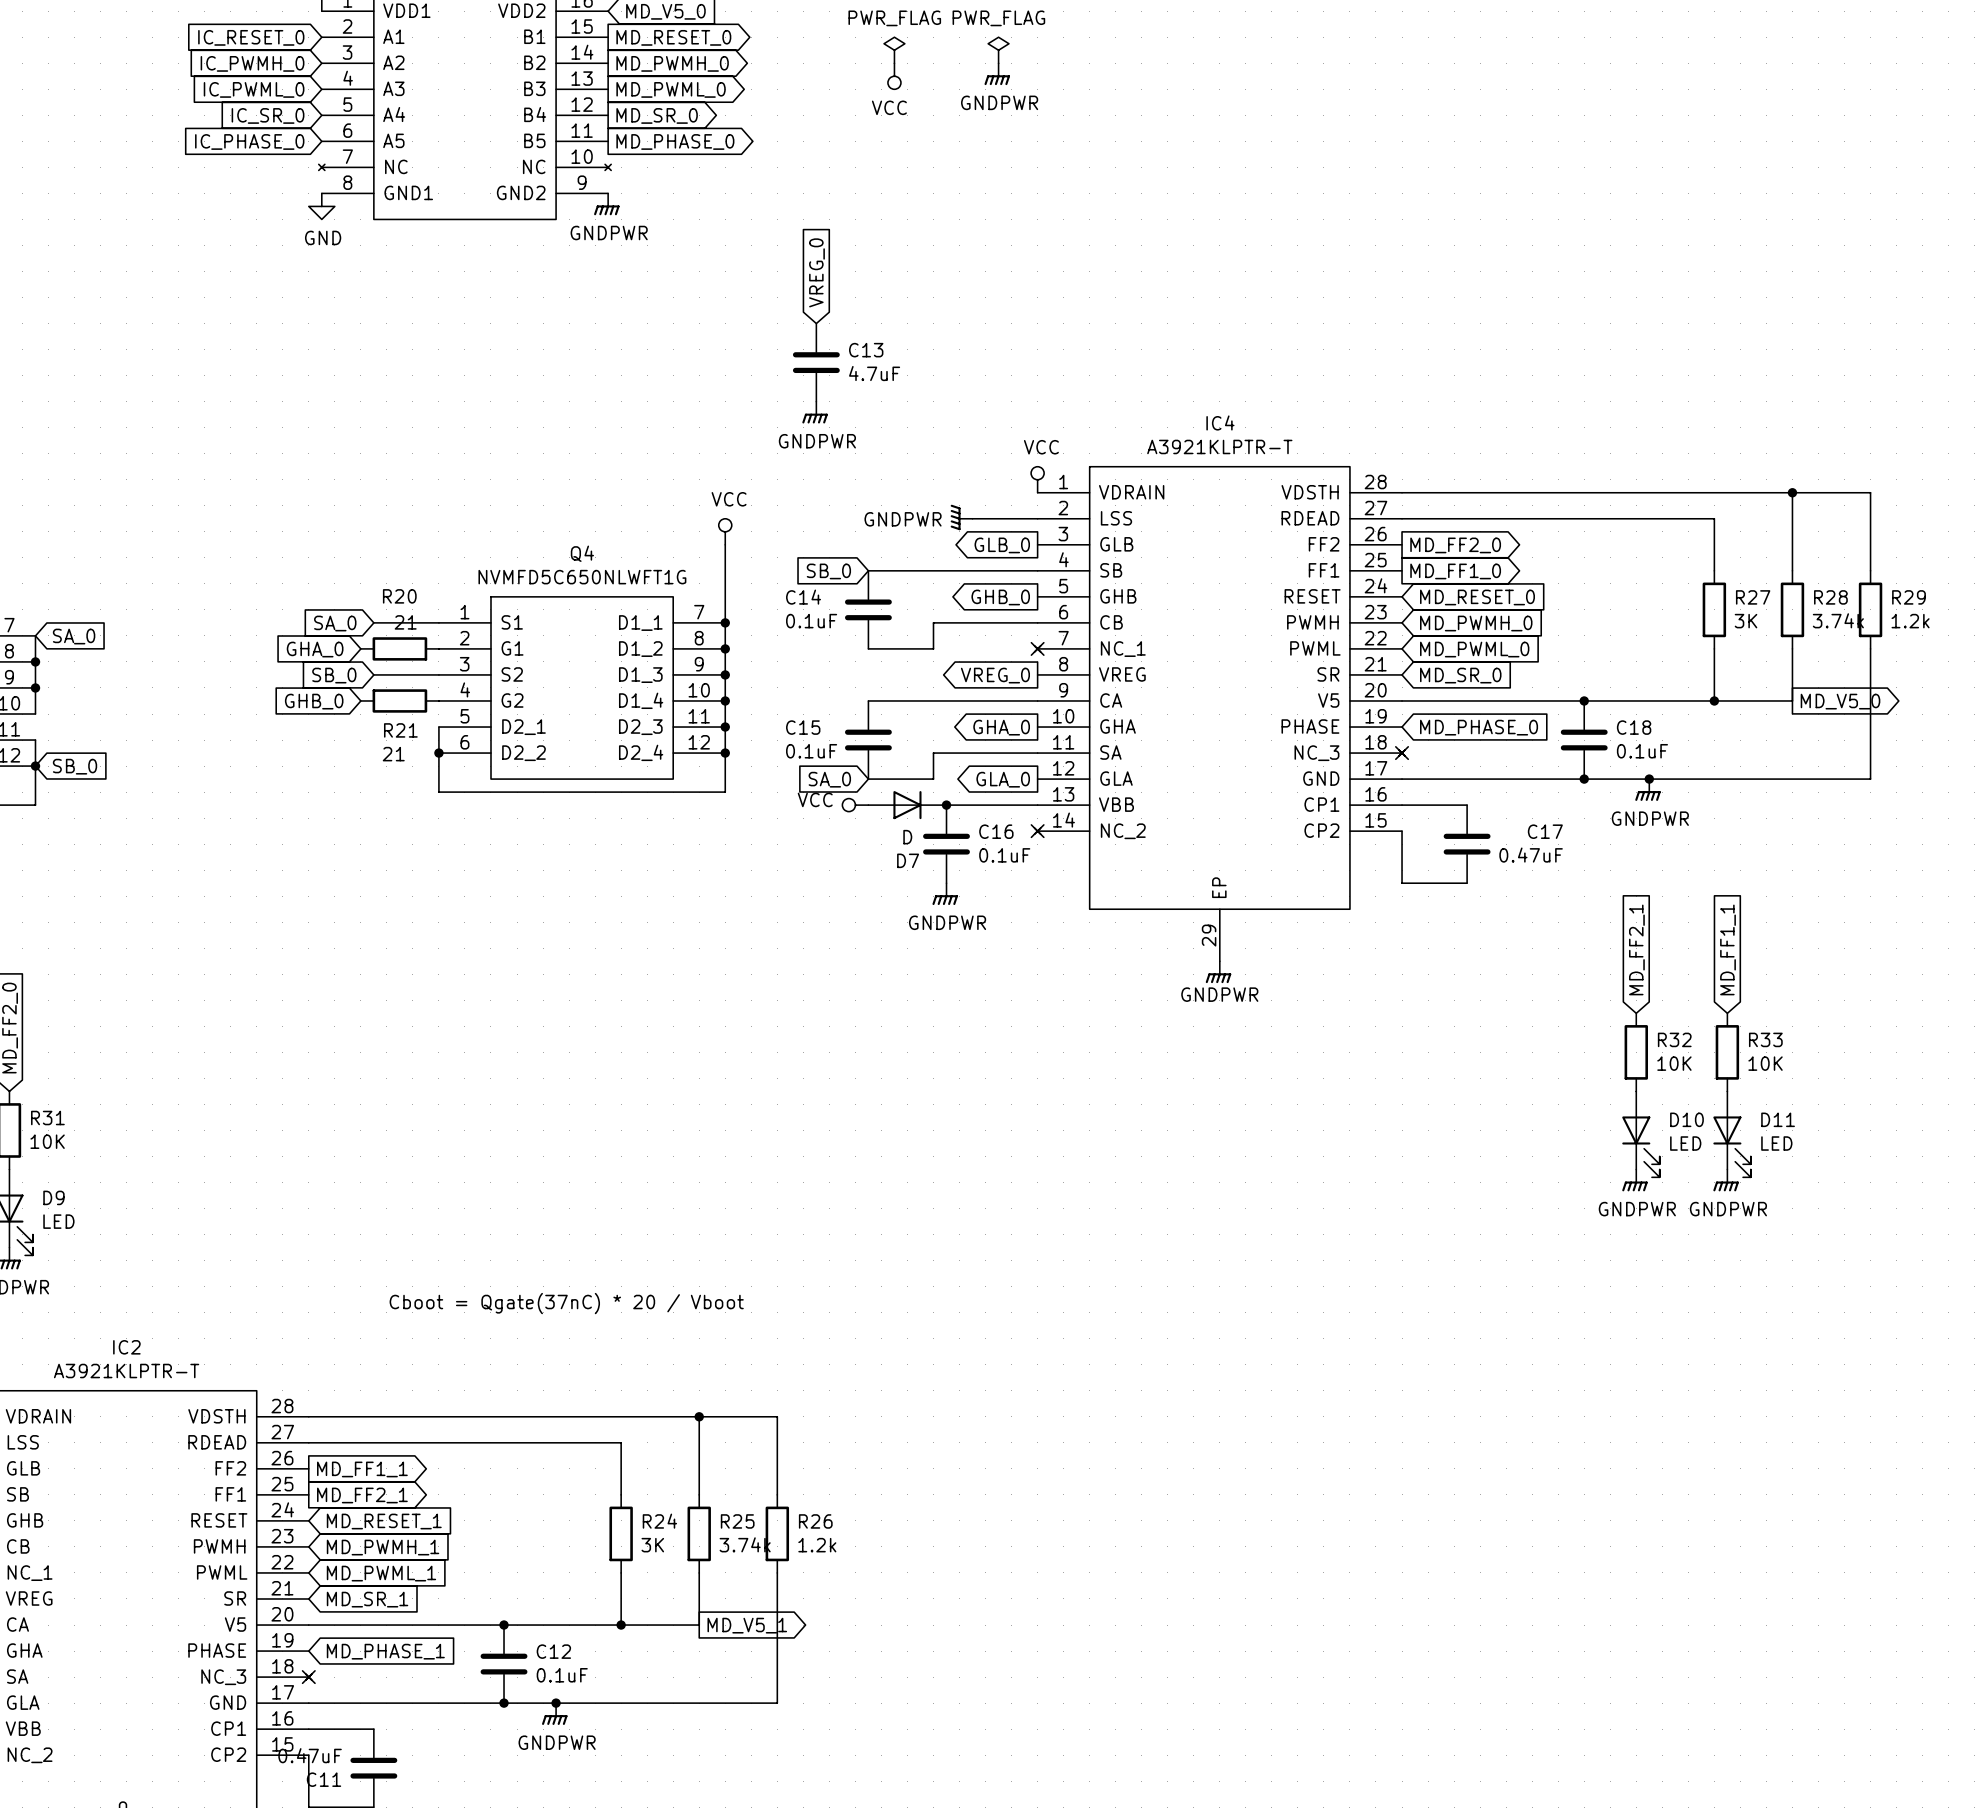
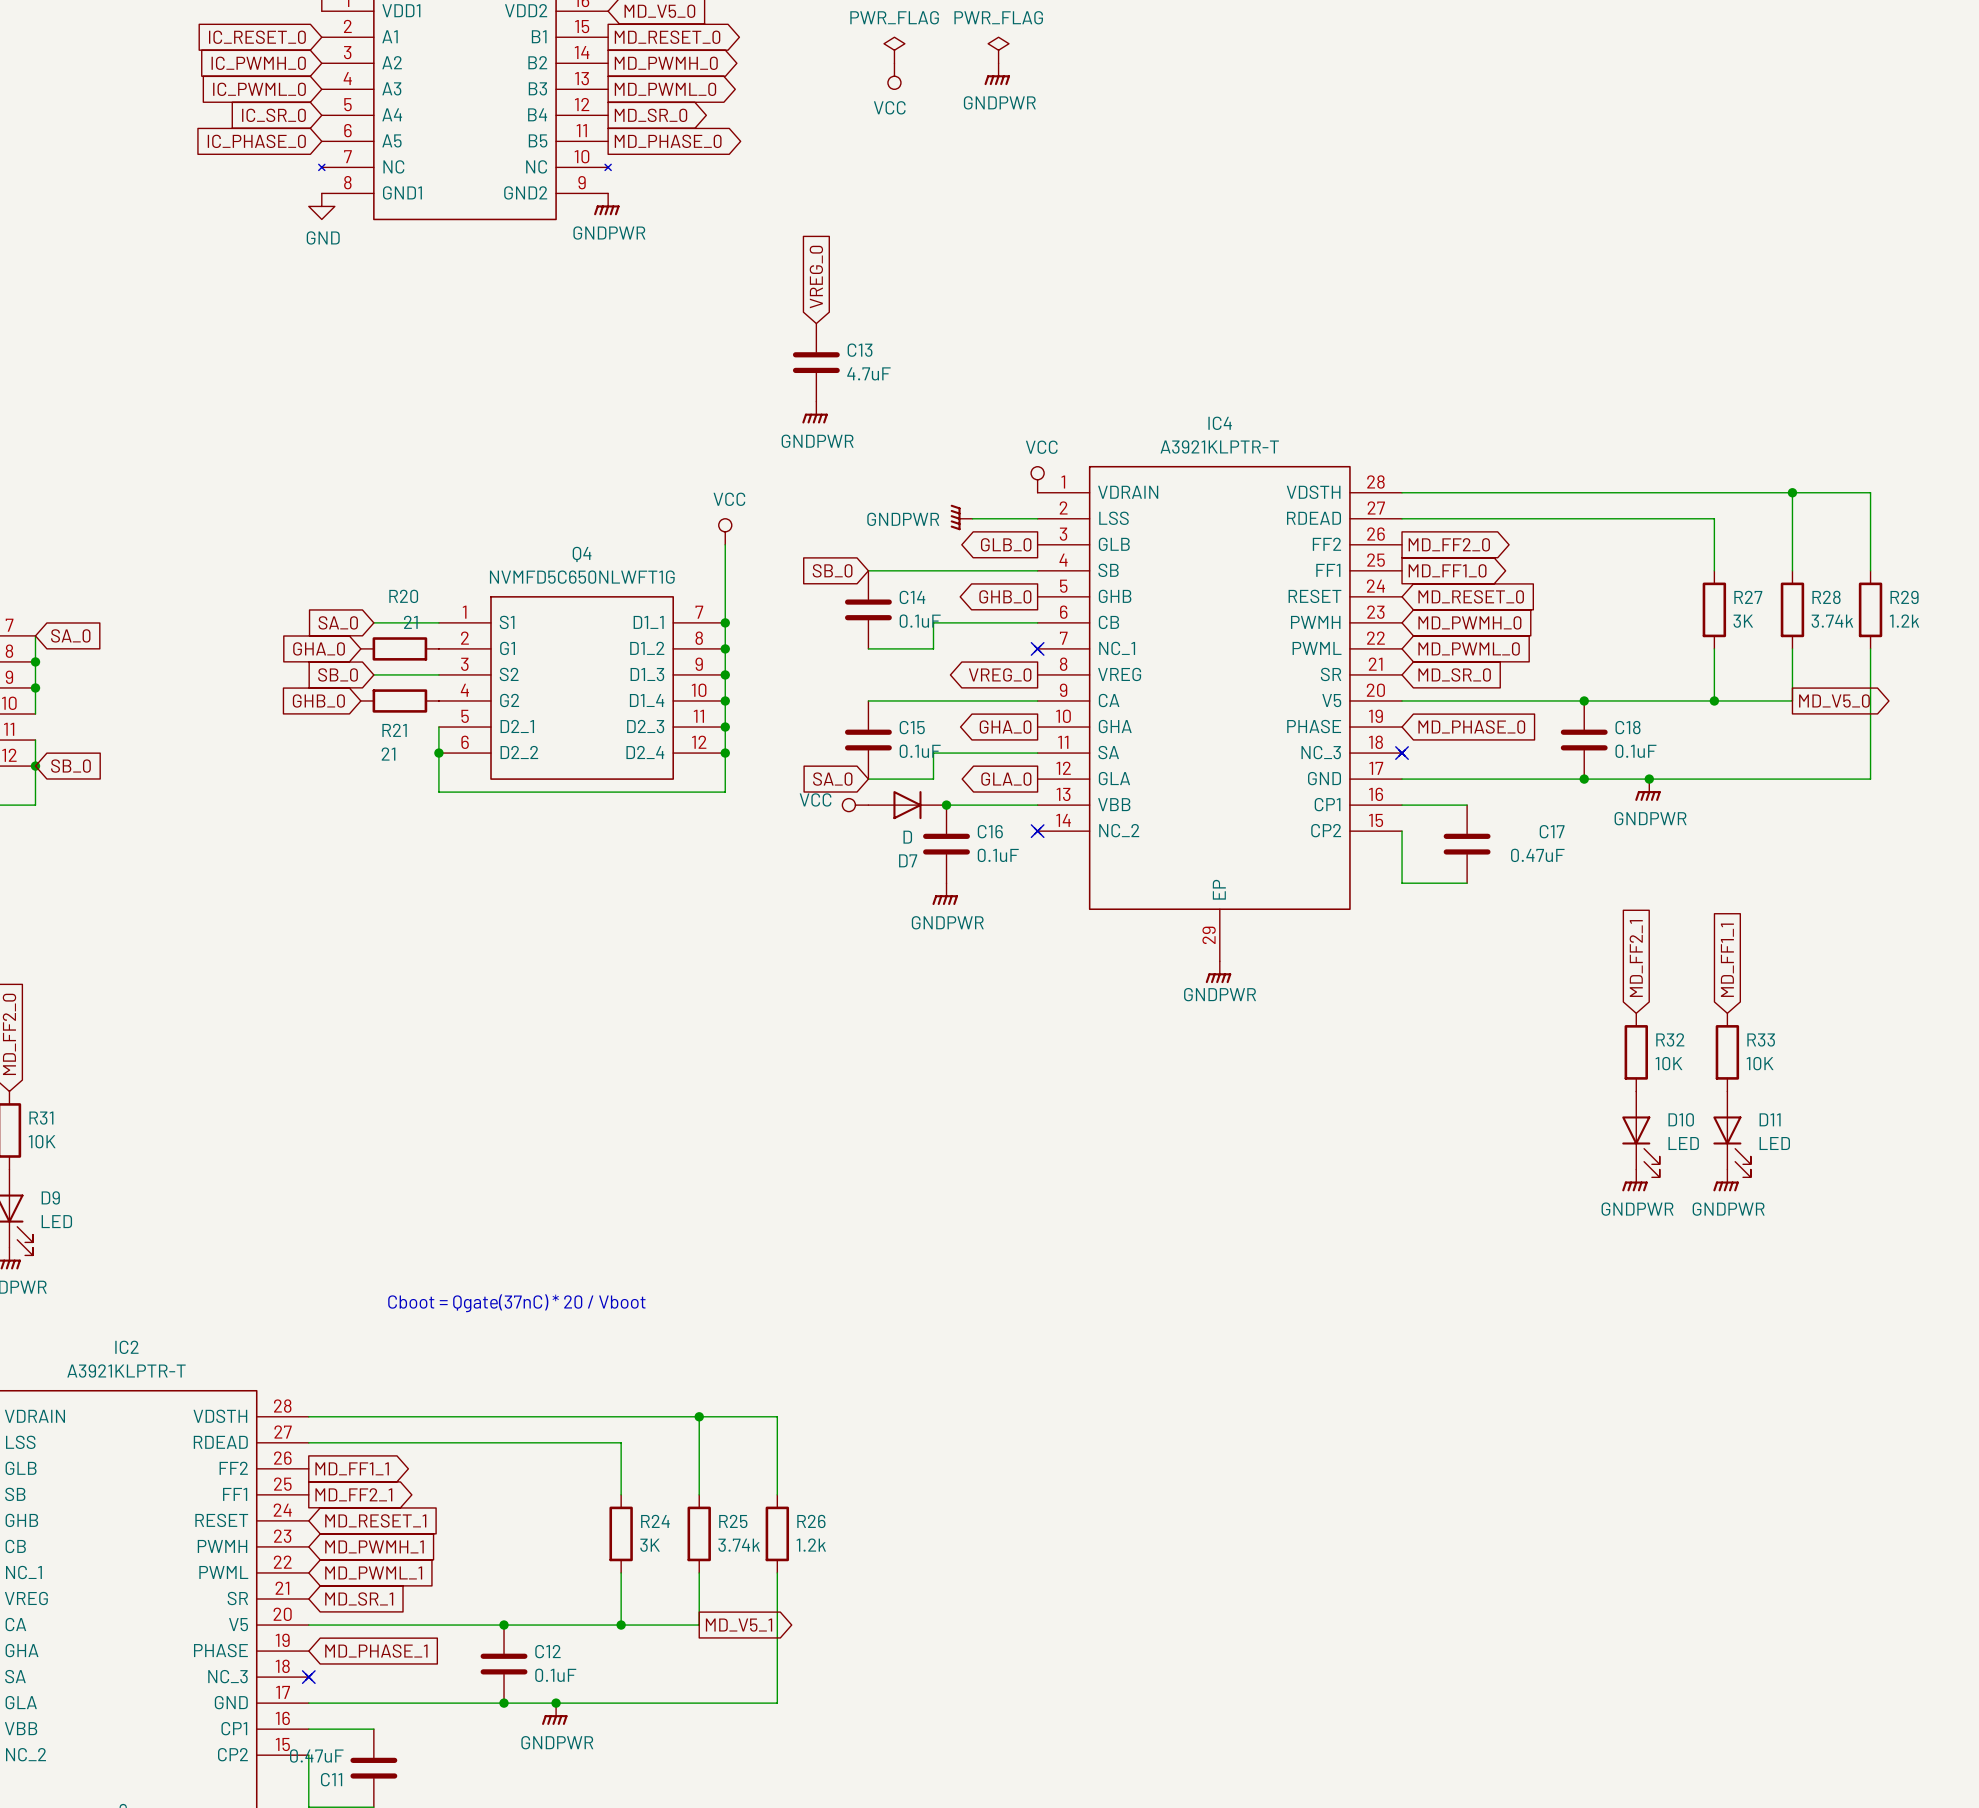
C14 name position: C14 (803, 597) -> C14 (912, 597)
C14 value position: 0.1uF (811, 621) -> 0.1uF (920, 621)
C15 name position: C15 (803, 727) -> C15 (912, 727)
C15 value position: 0.1uF (811, 751) -> 0.1uF (920, 751)

